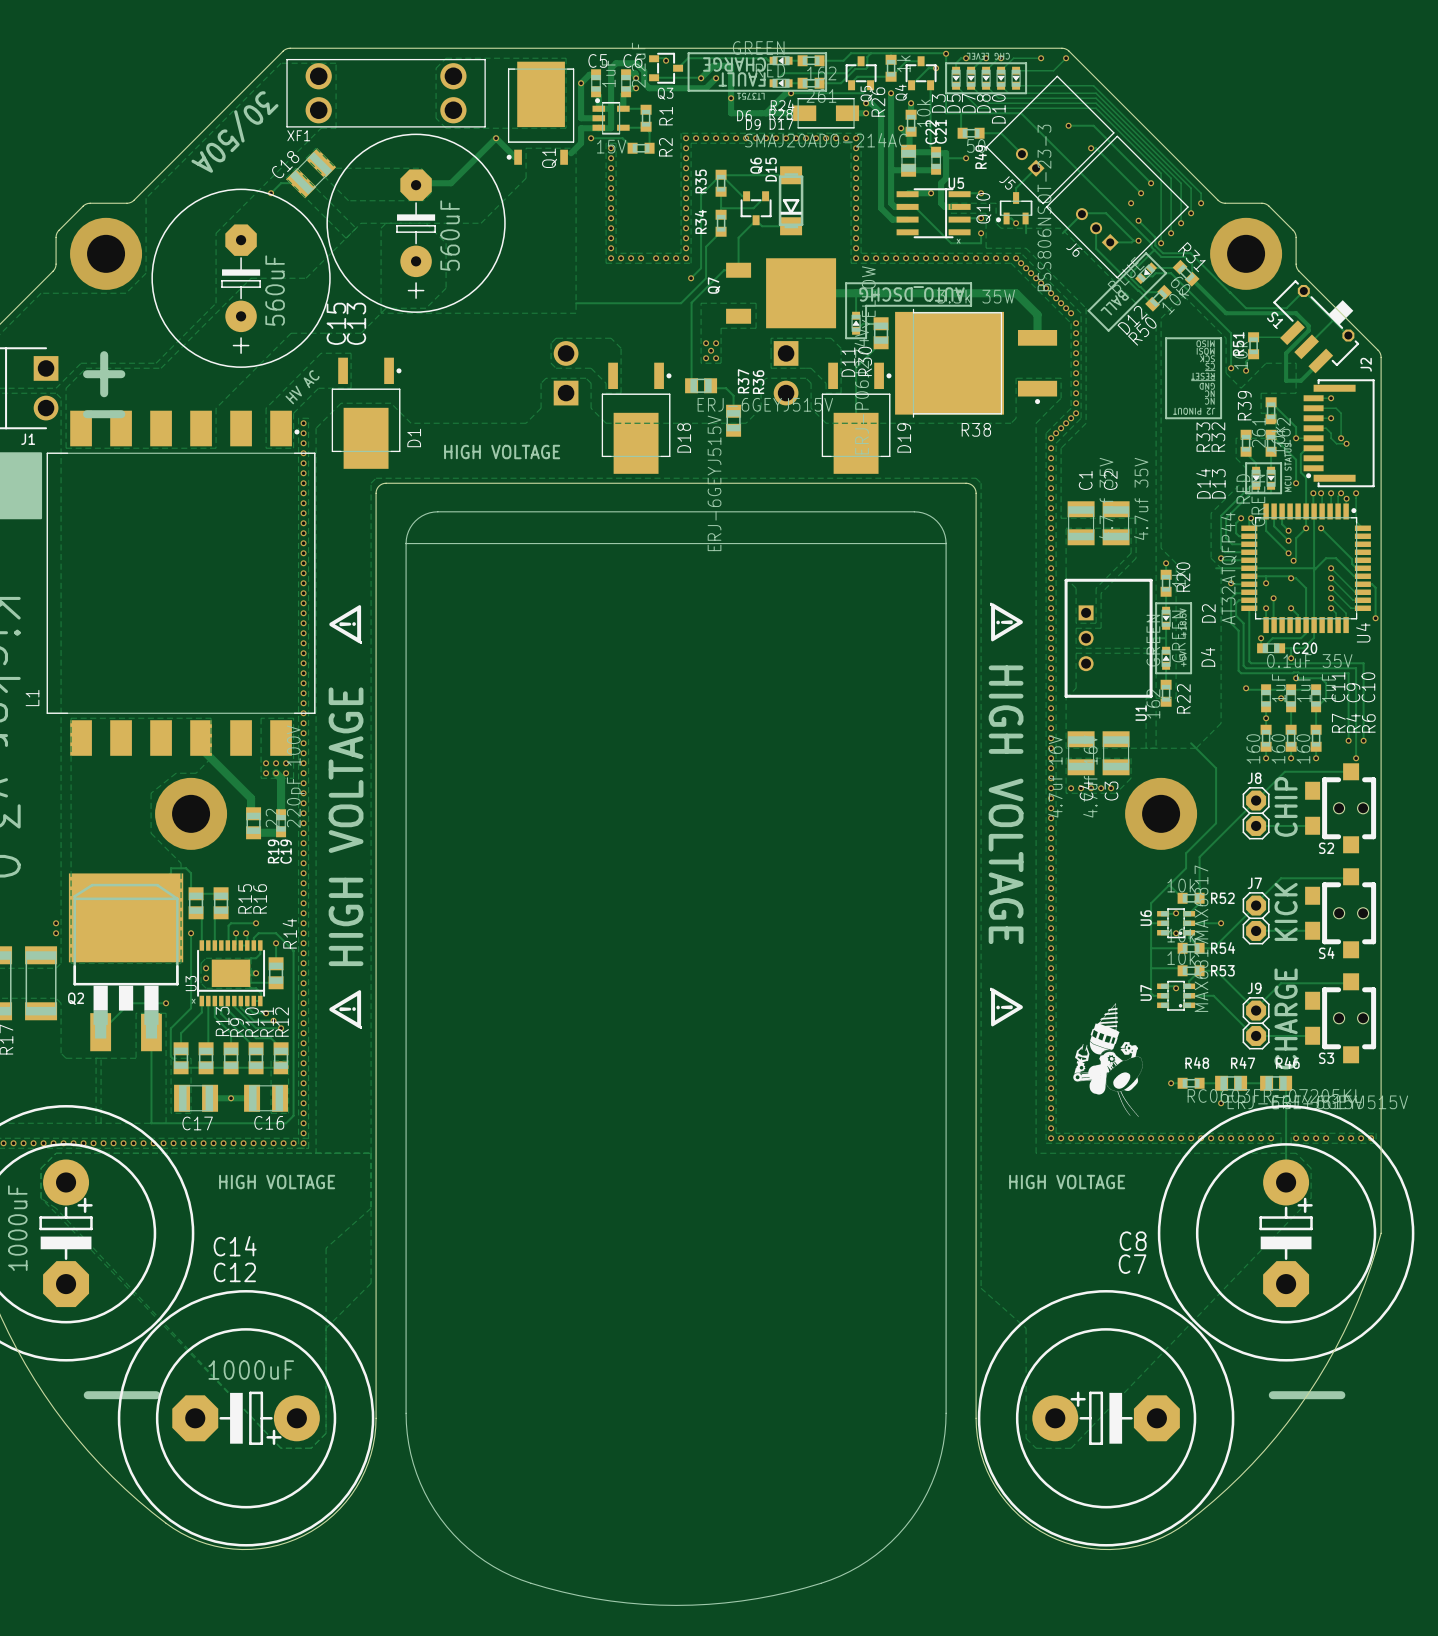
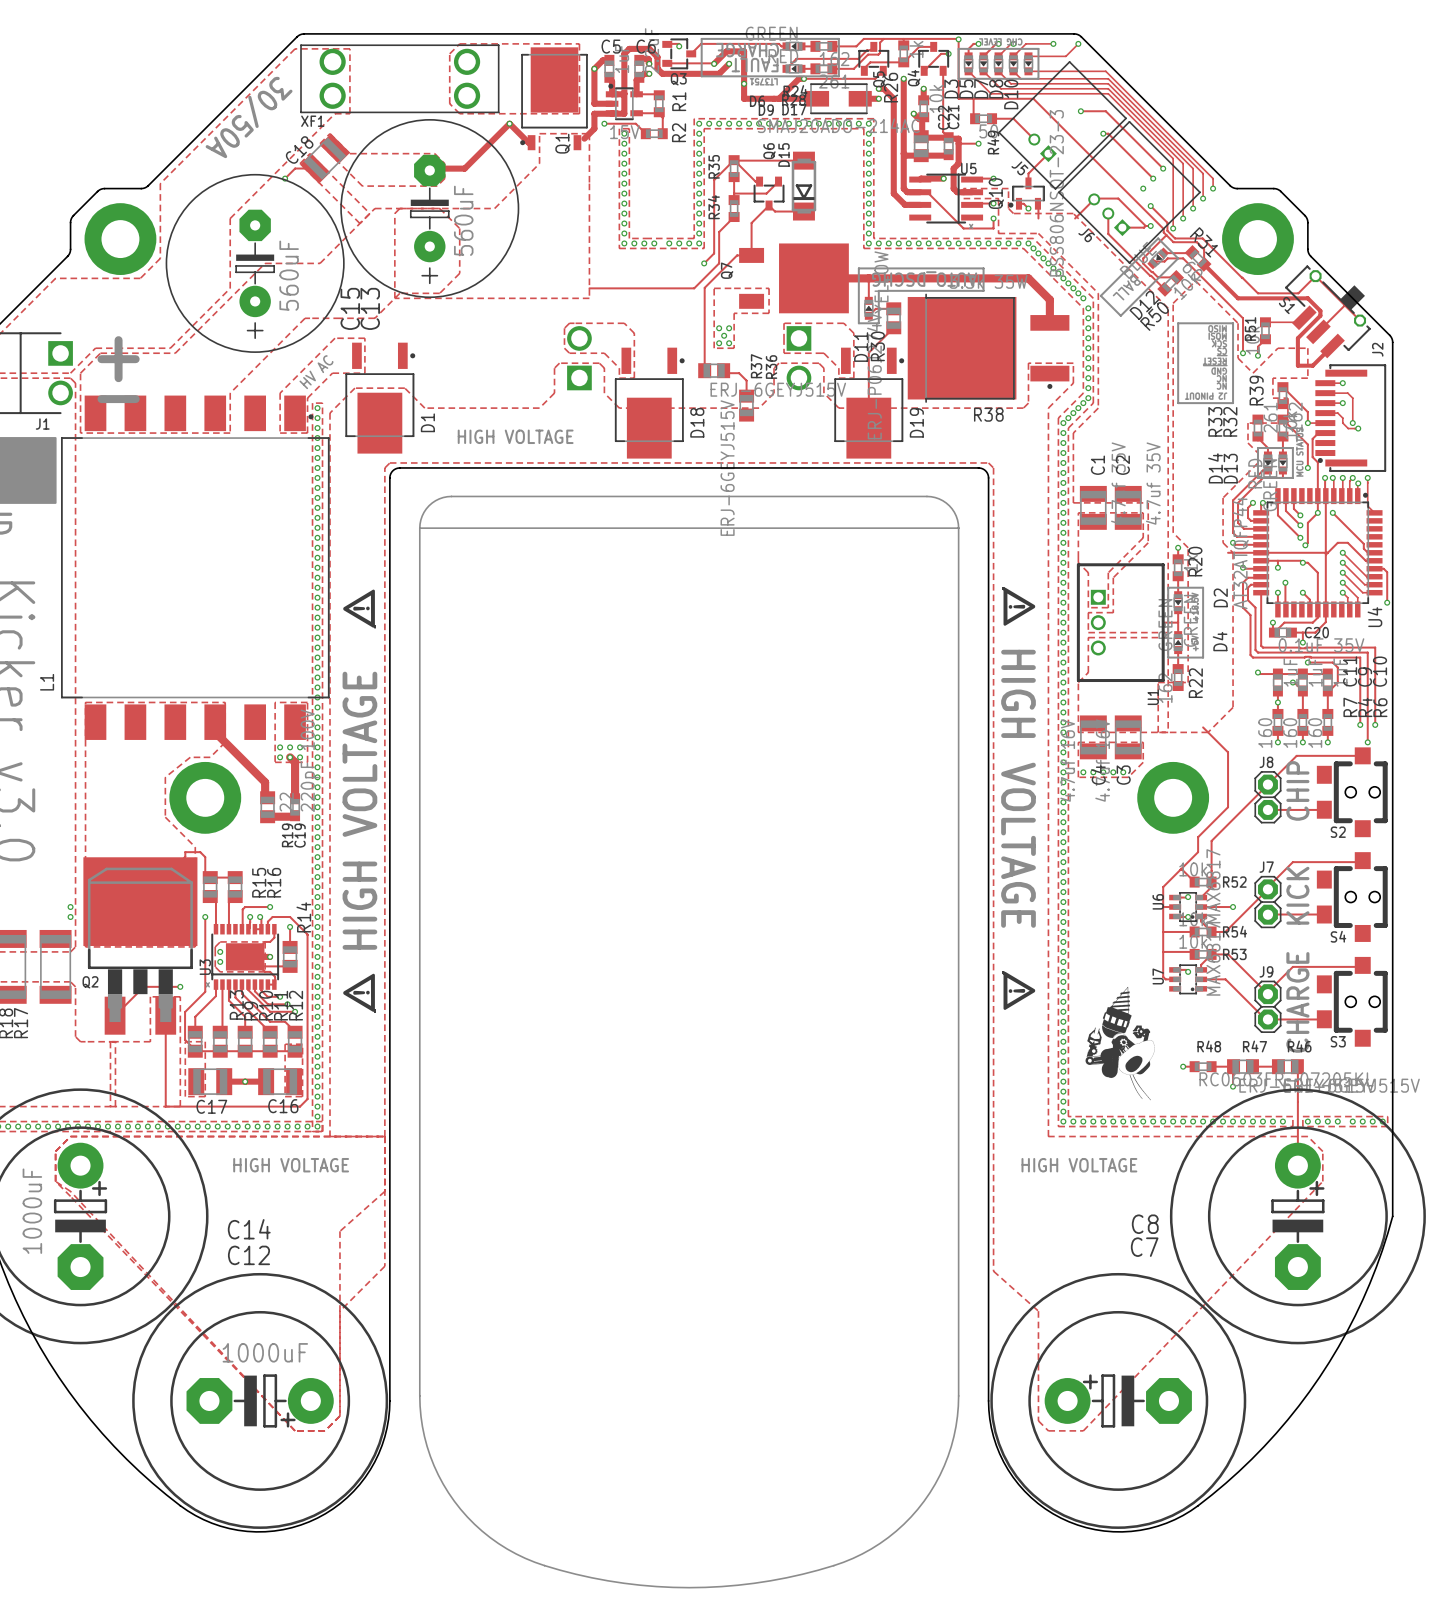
text: - (122, 1395) -> none
text: - (1307, 1395) -> none

